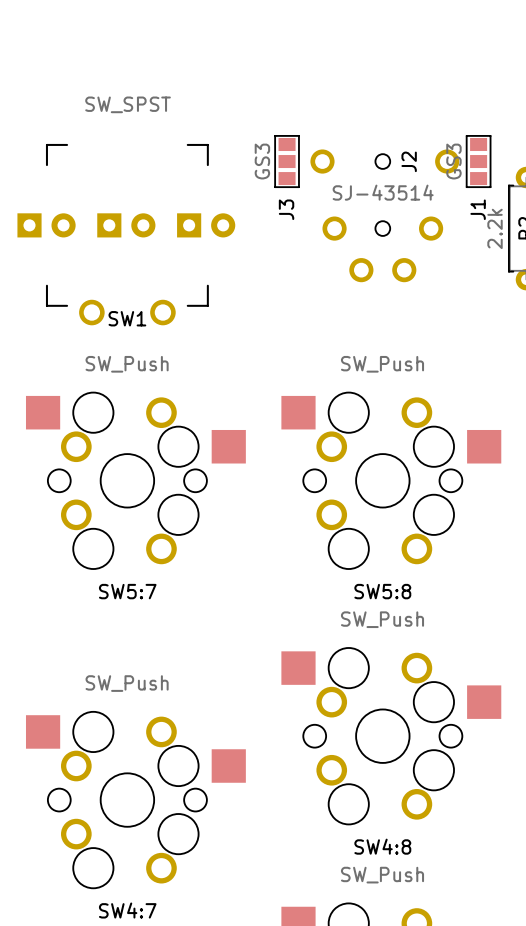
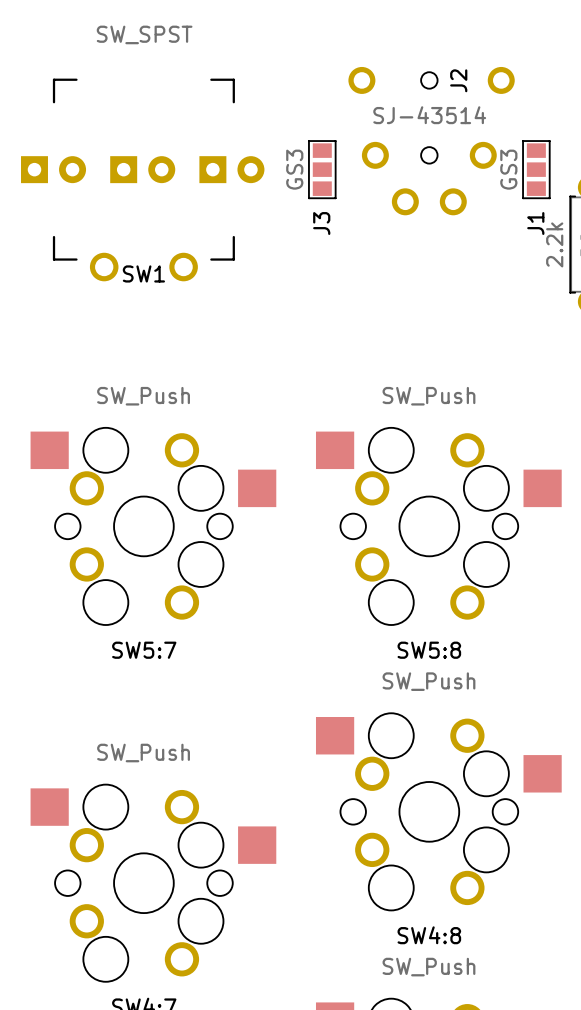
part: none -> (53, 169)
part: none -> (142, 169)
part: none -> (231, 169)
J2 position: (384, 215) -> (431, 141)
part: (46, 225) -> none
part: (126, 225) -> none
part: (206, 225) -> none
SW1 position: (127, 234) -> (143, 179)

